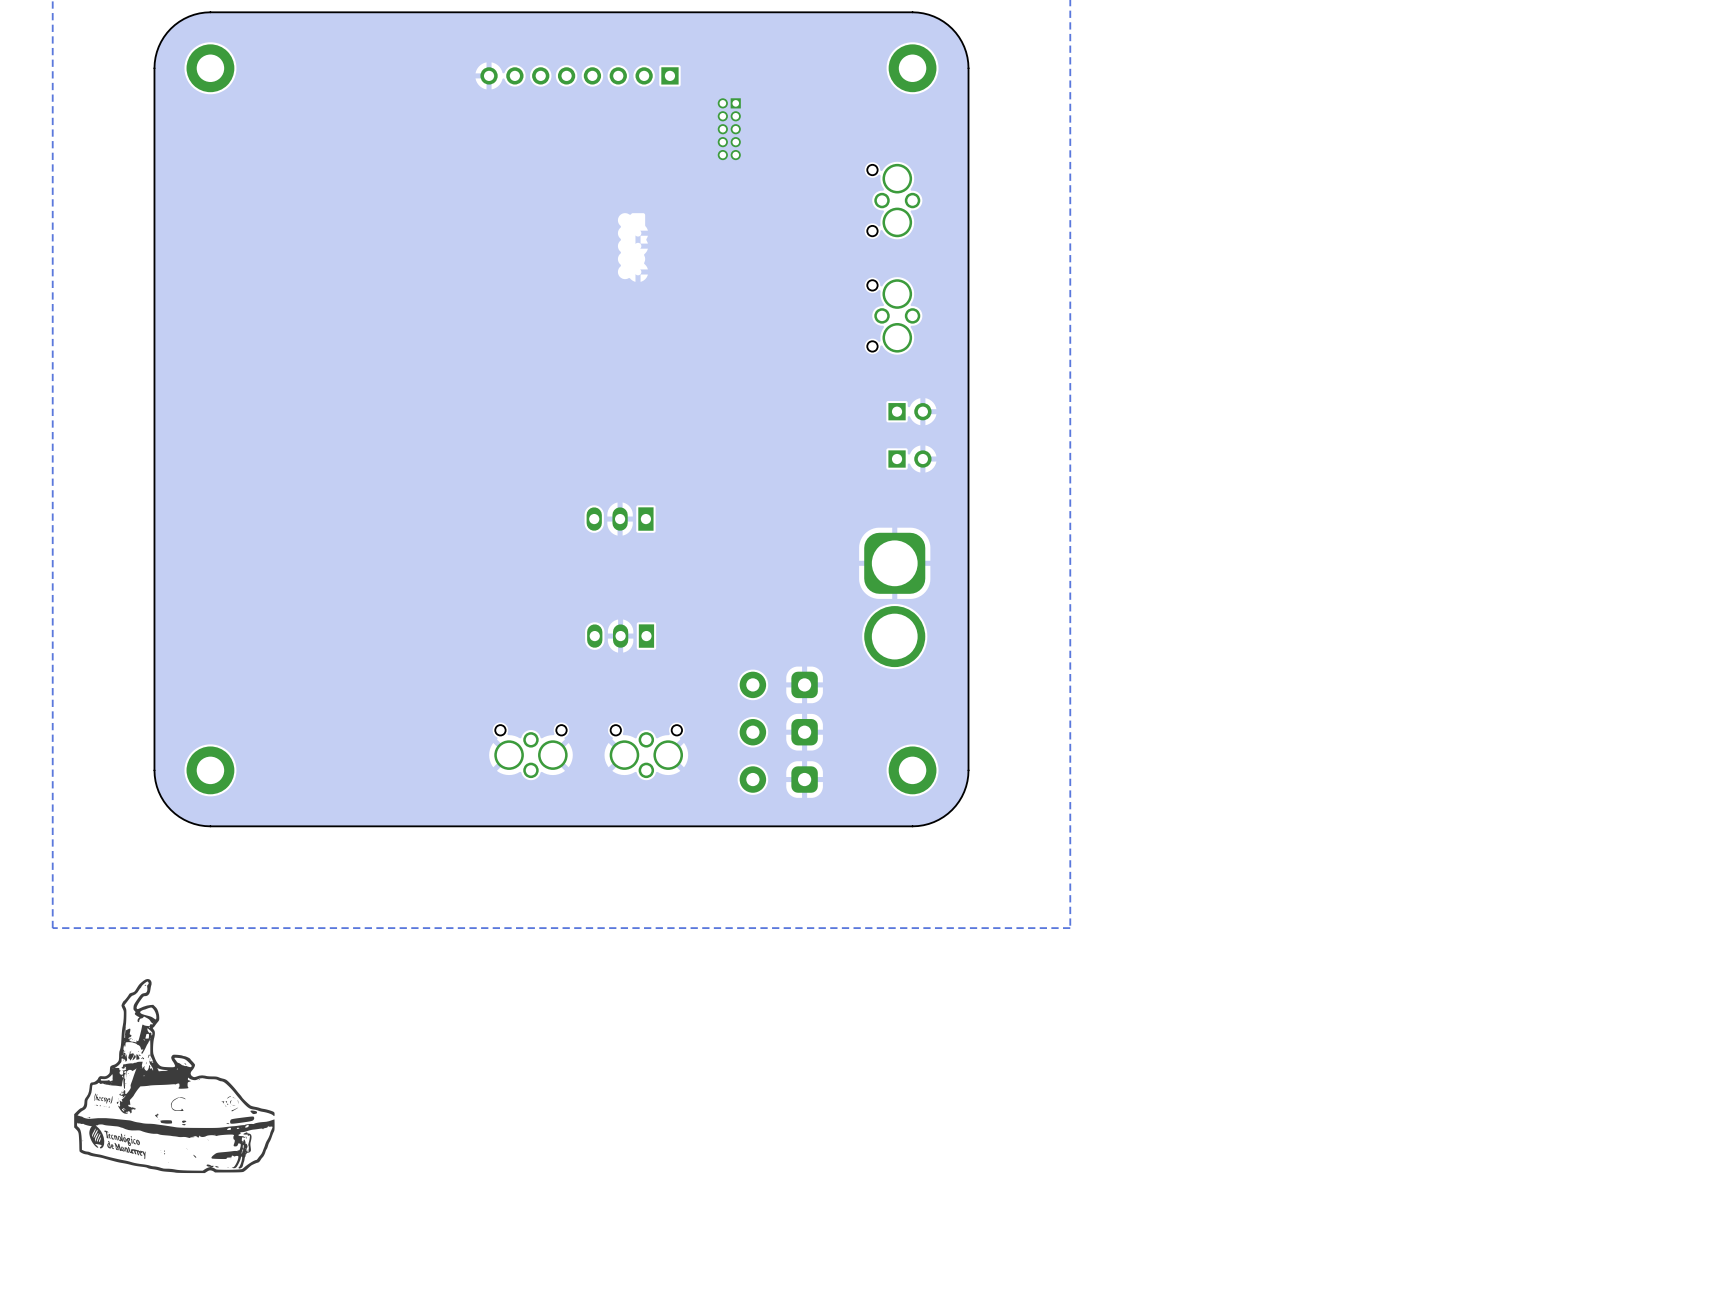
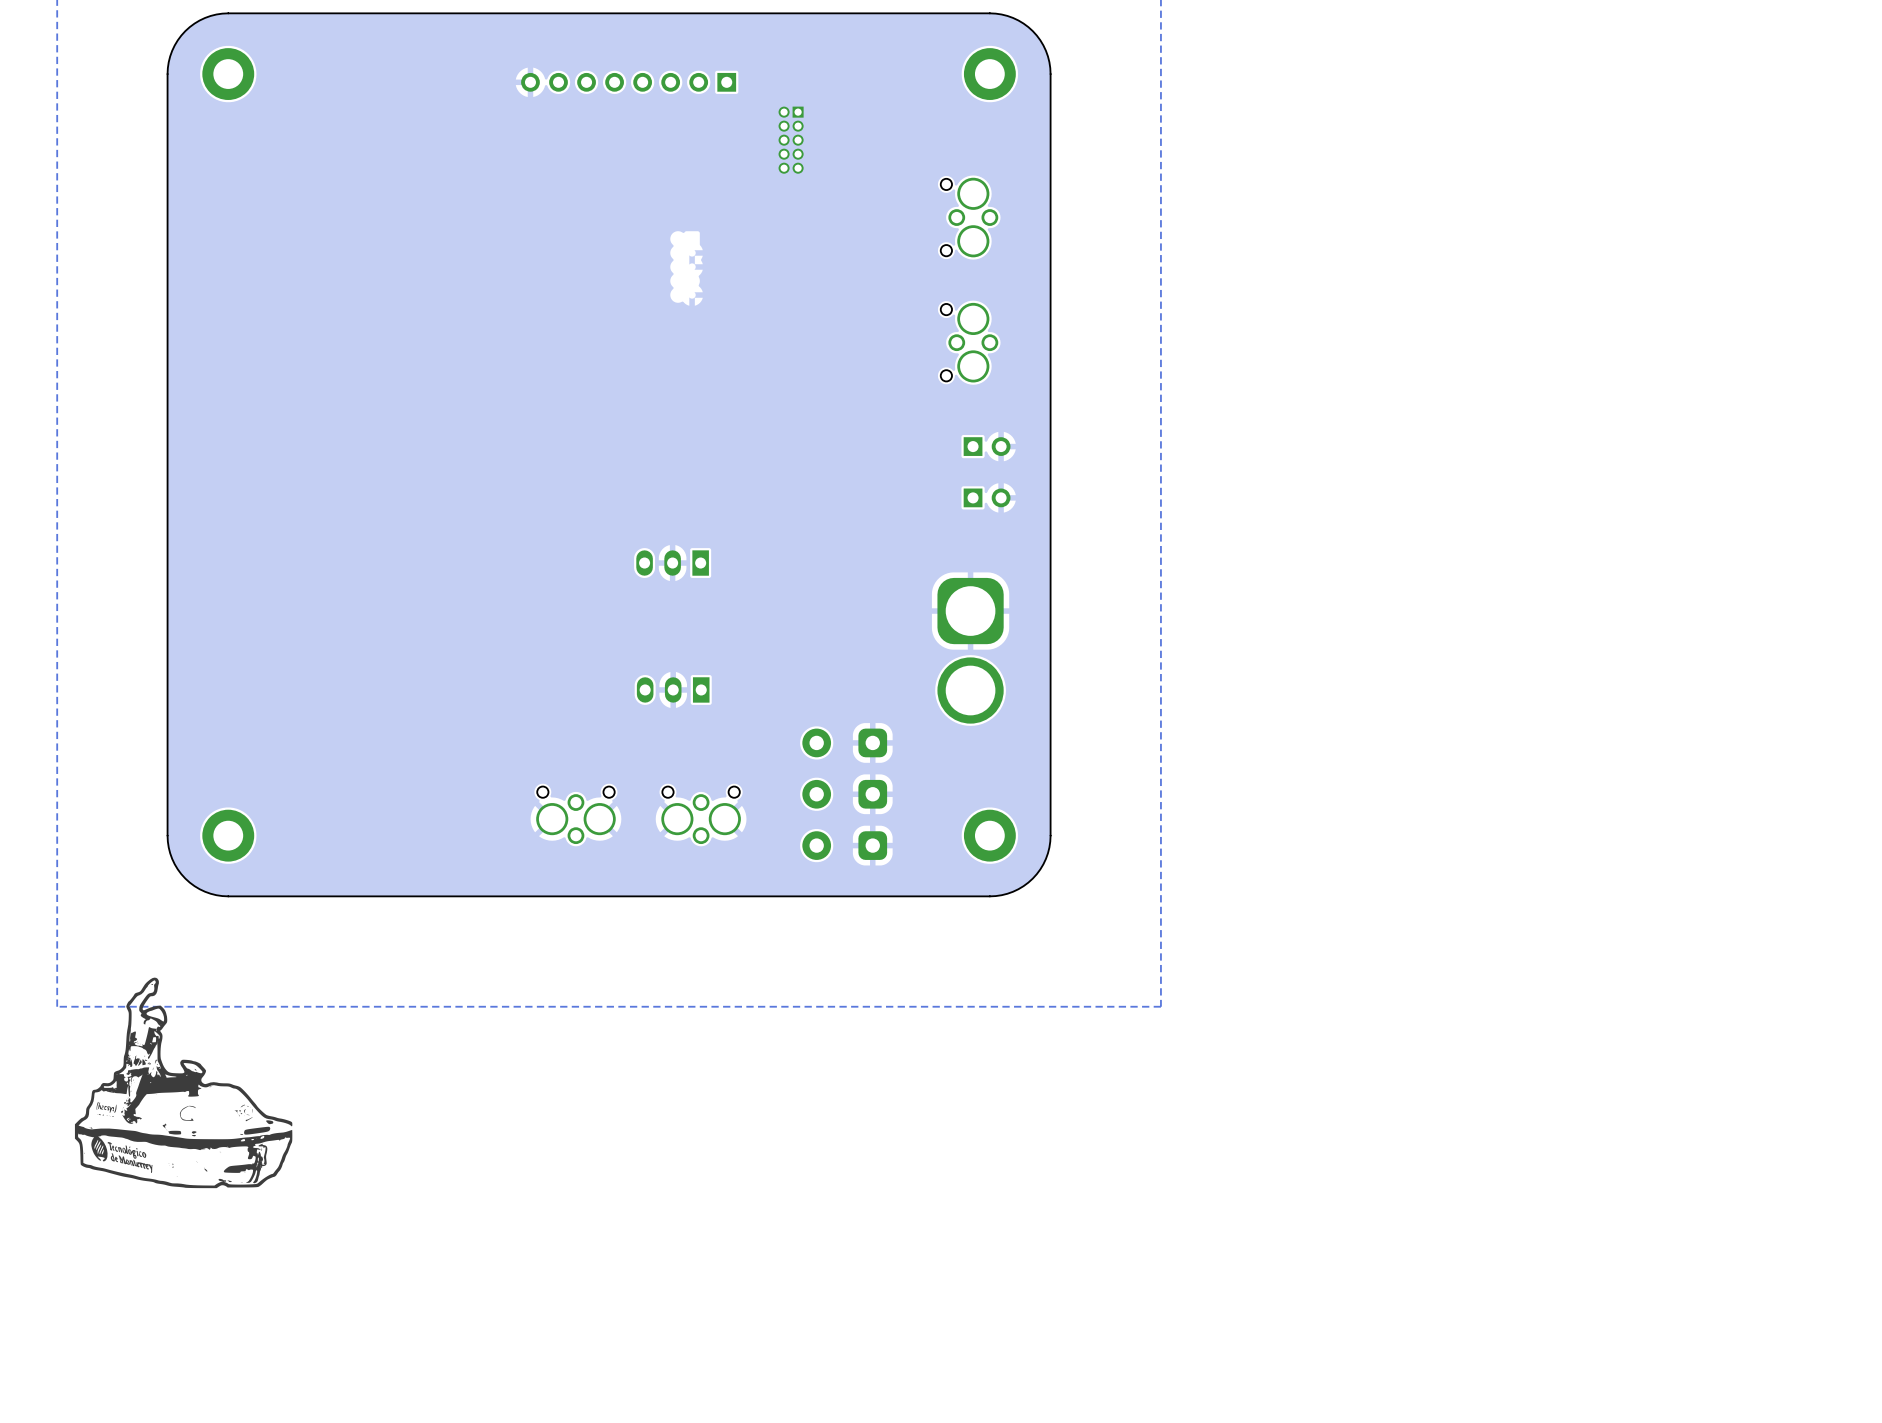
drawing position: (174, 1076) -> (183, 1082)

